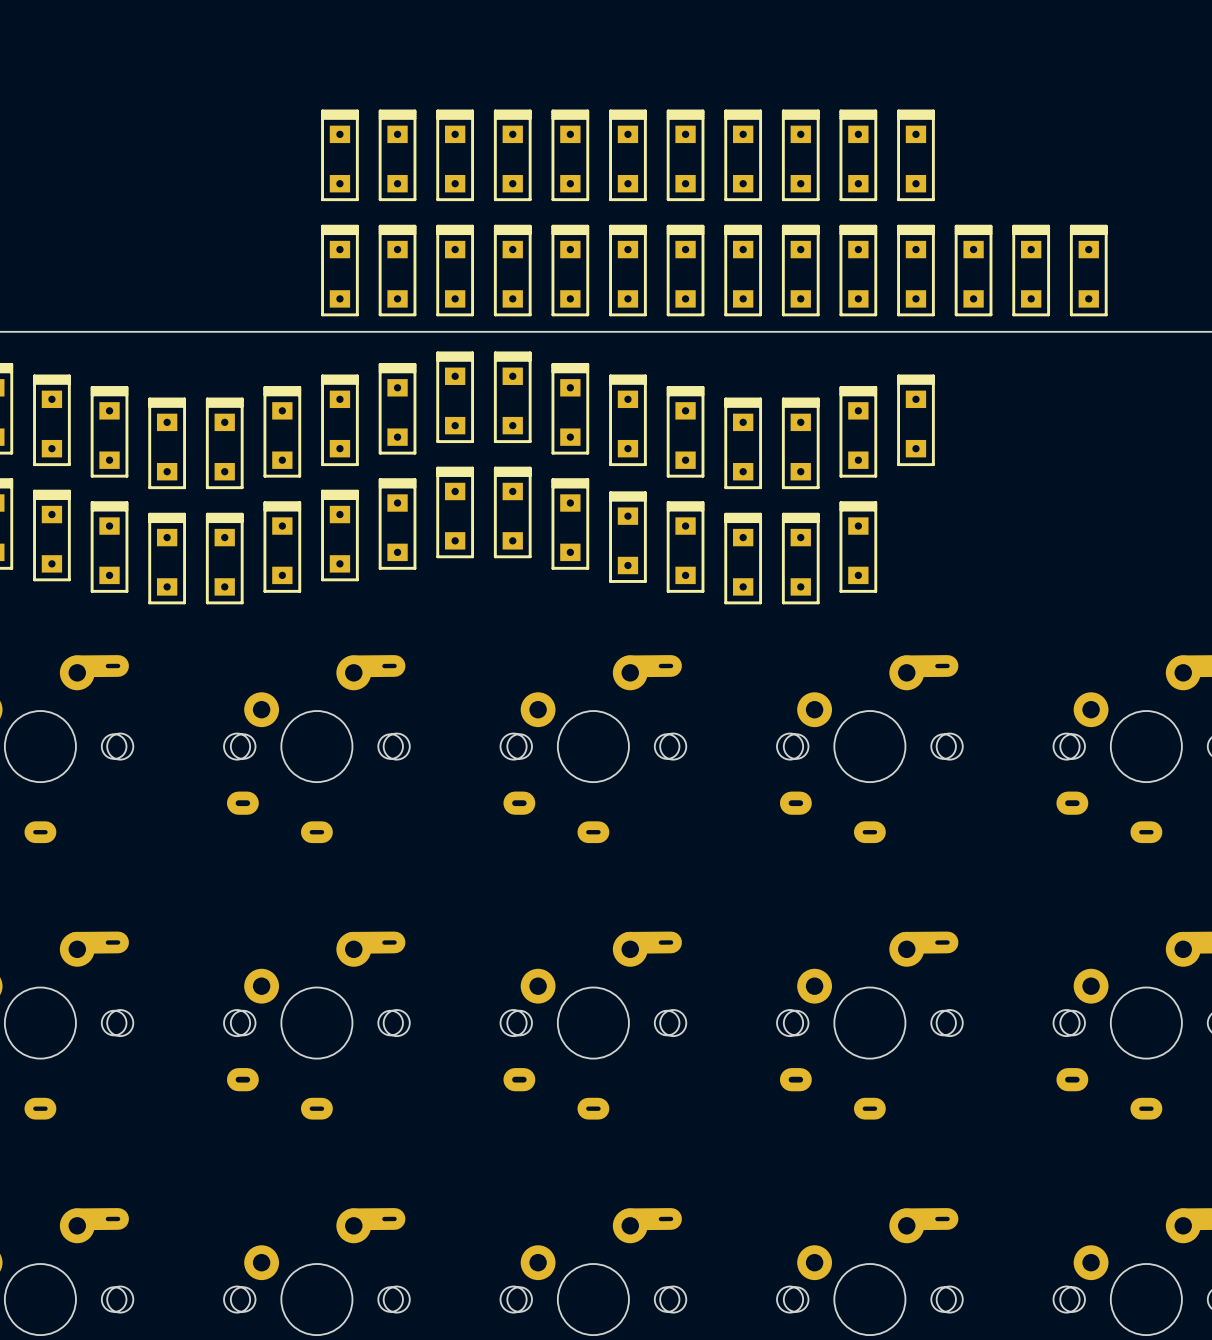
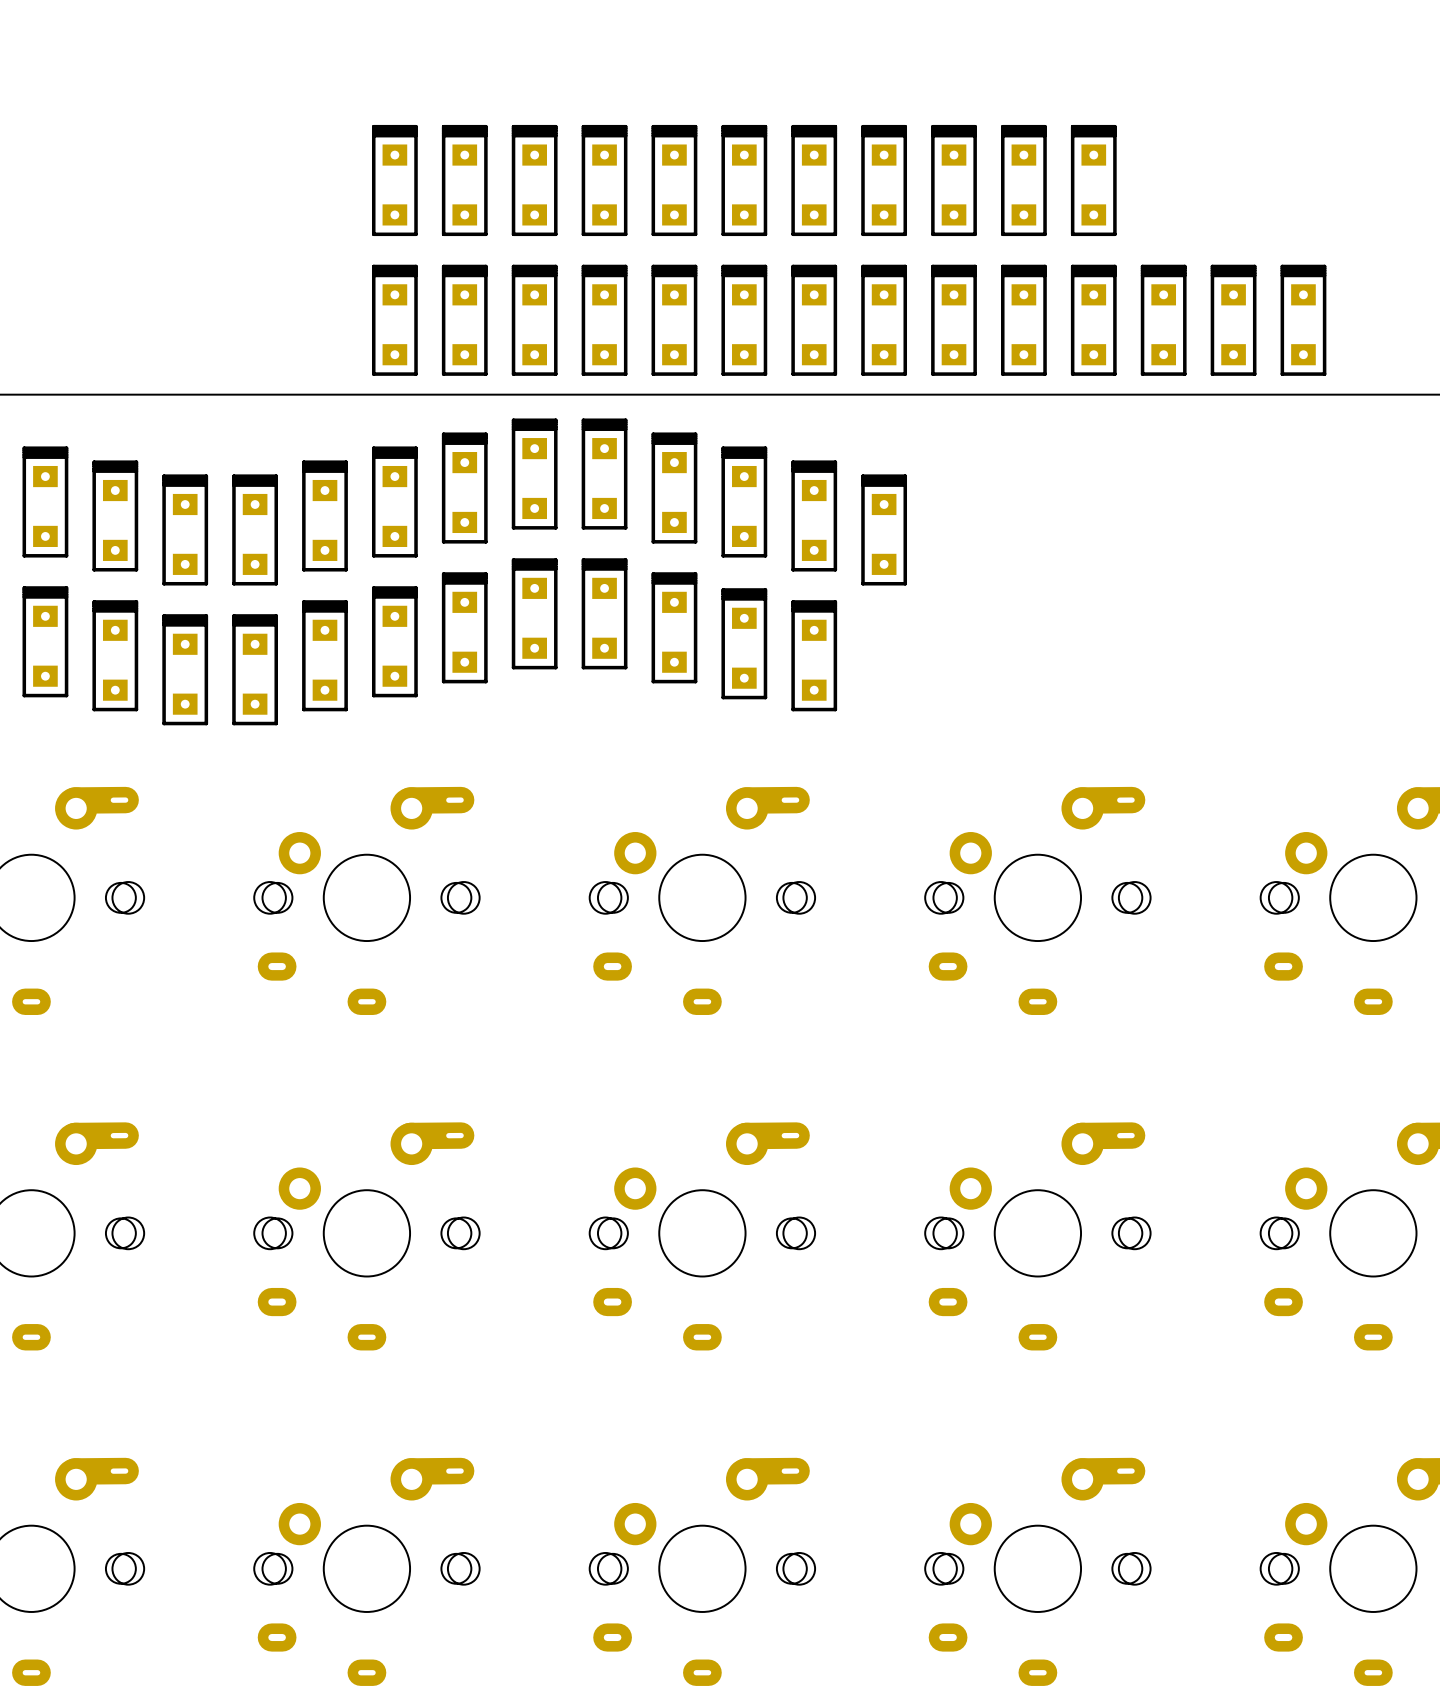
part: (915, 420) -> none
part: (858, 431) -> none
part: (800, 443) -> none
part: (858, 547) -> none
part: (743, 558) -> none
part: (800, 558) -> none

